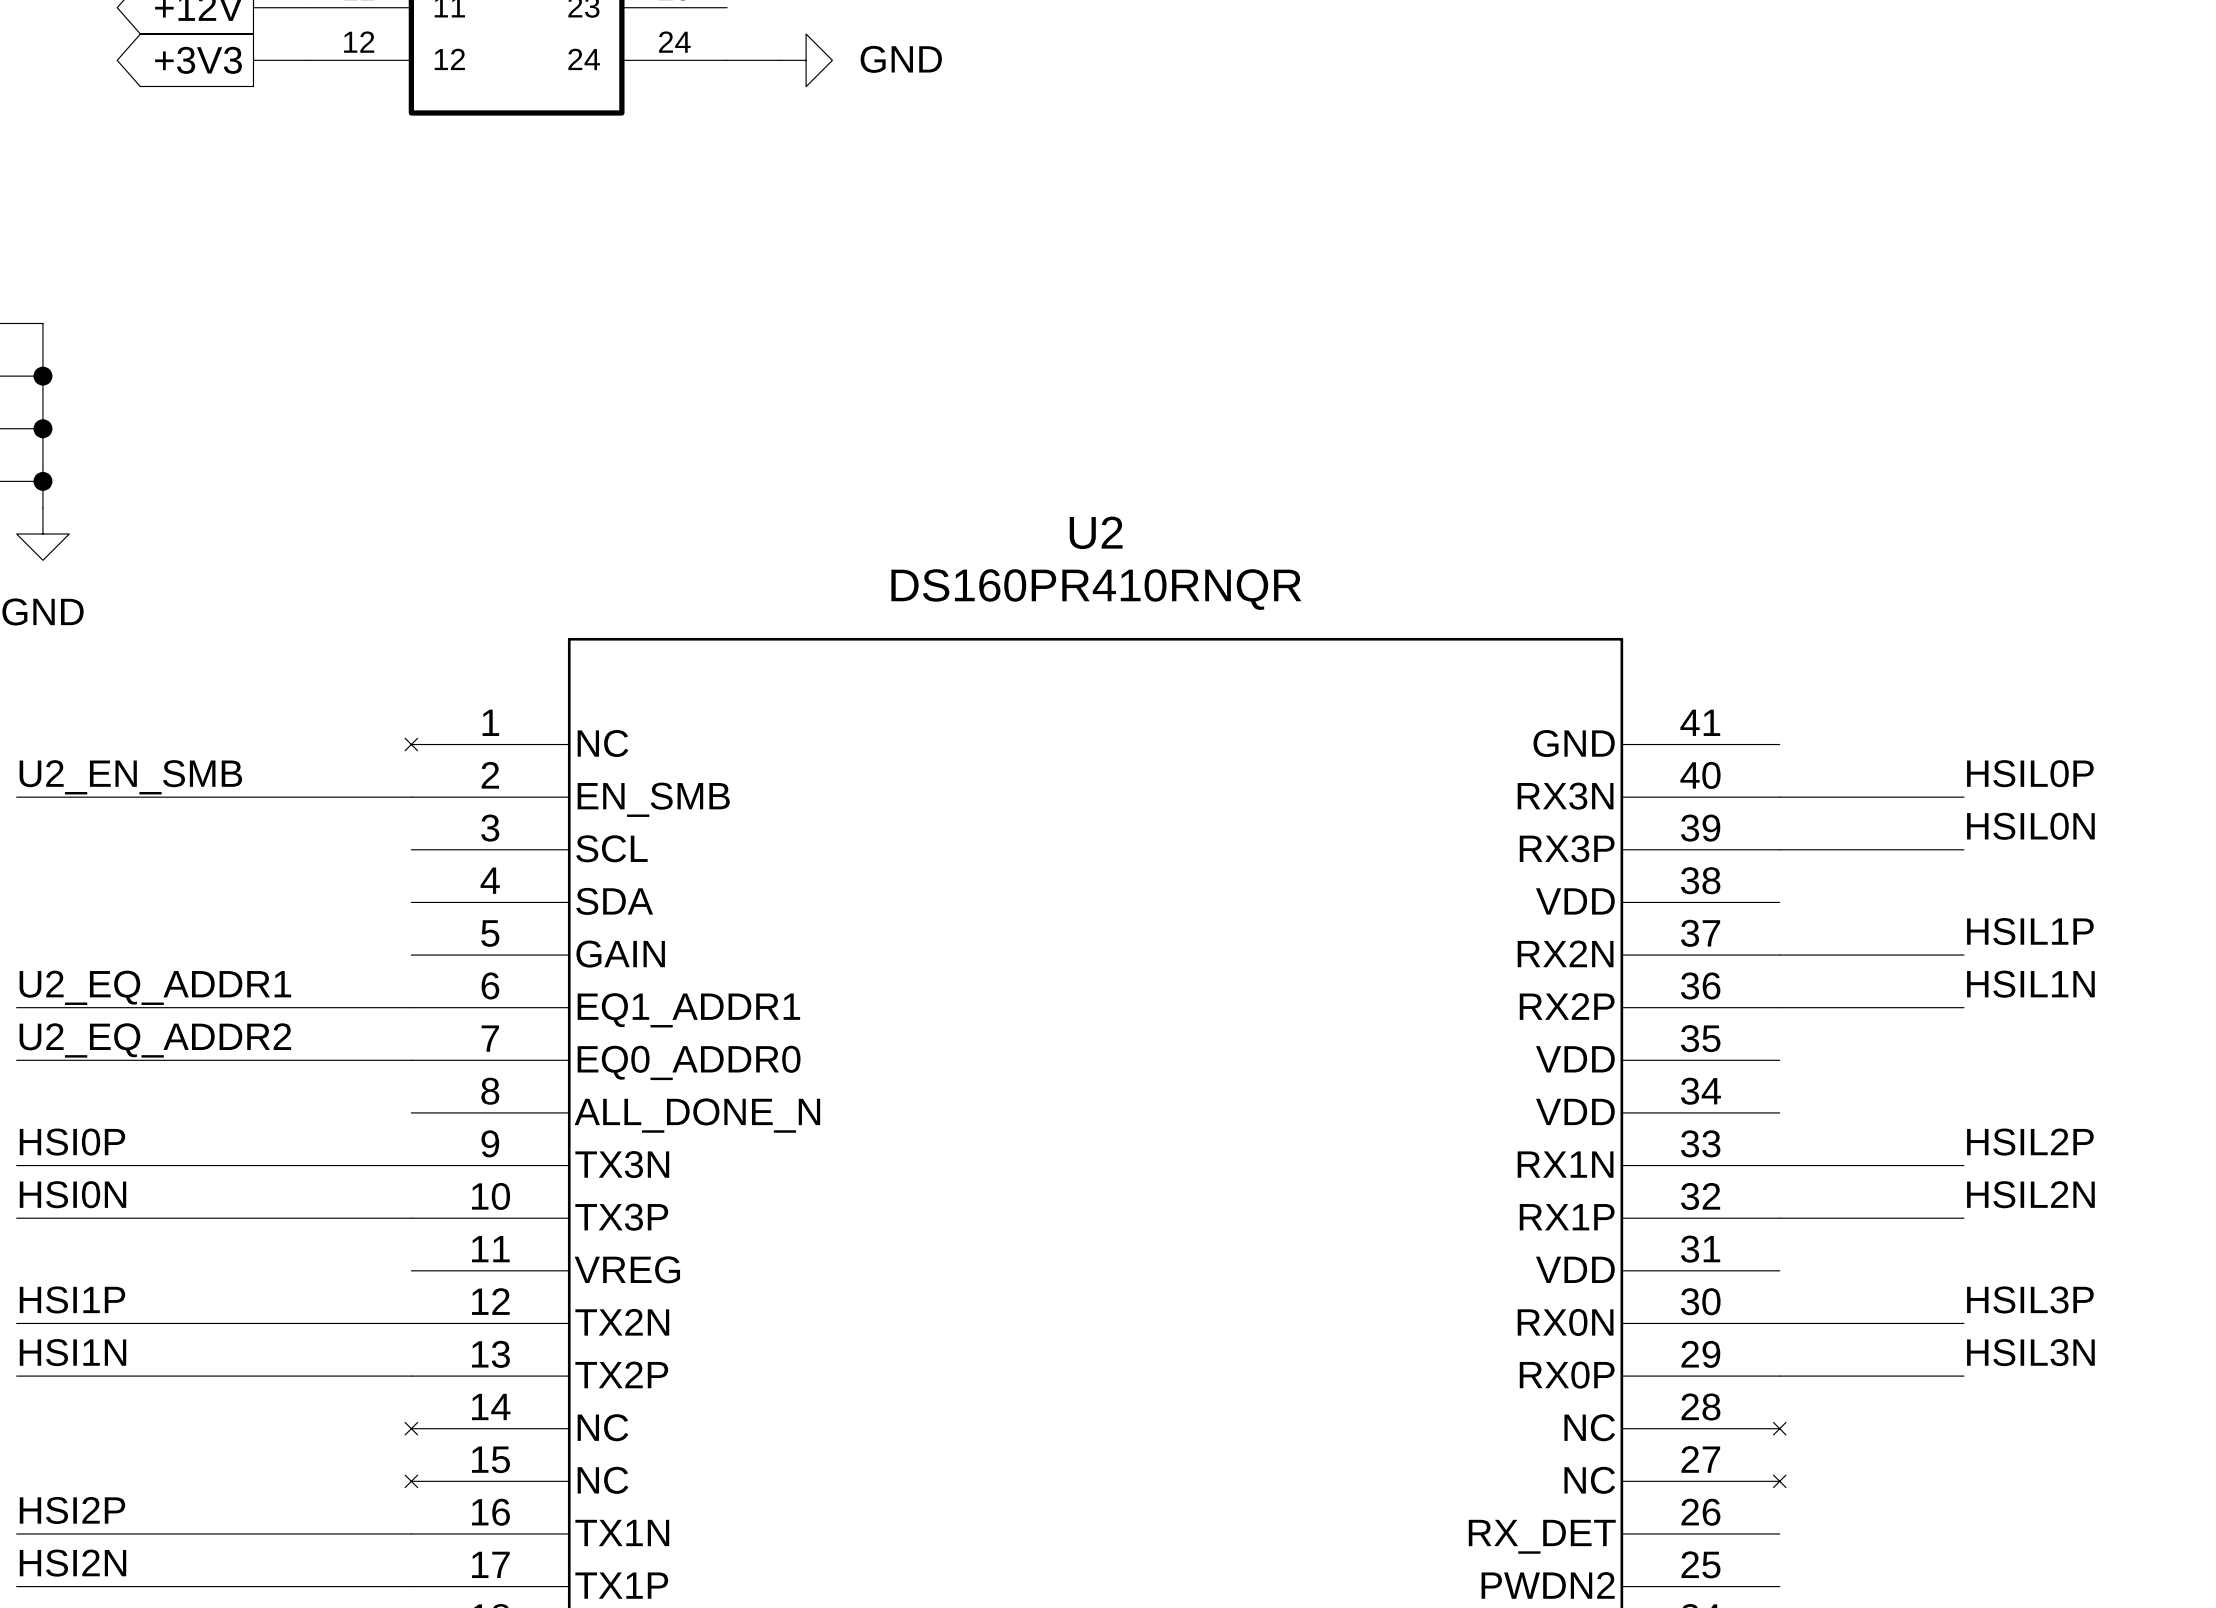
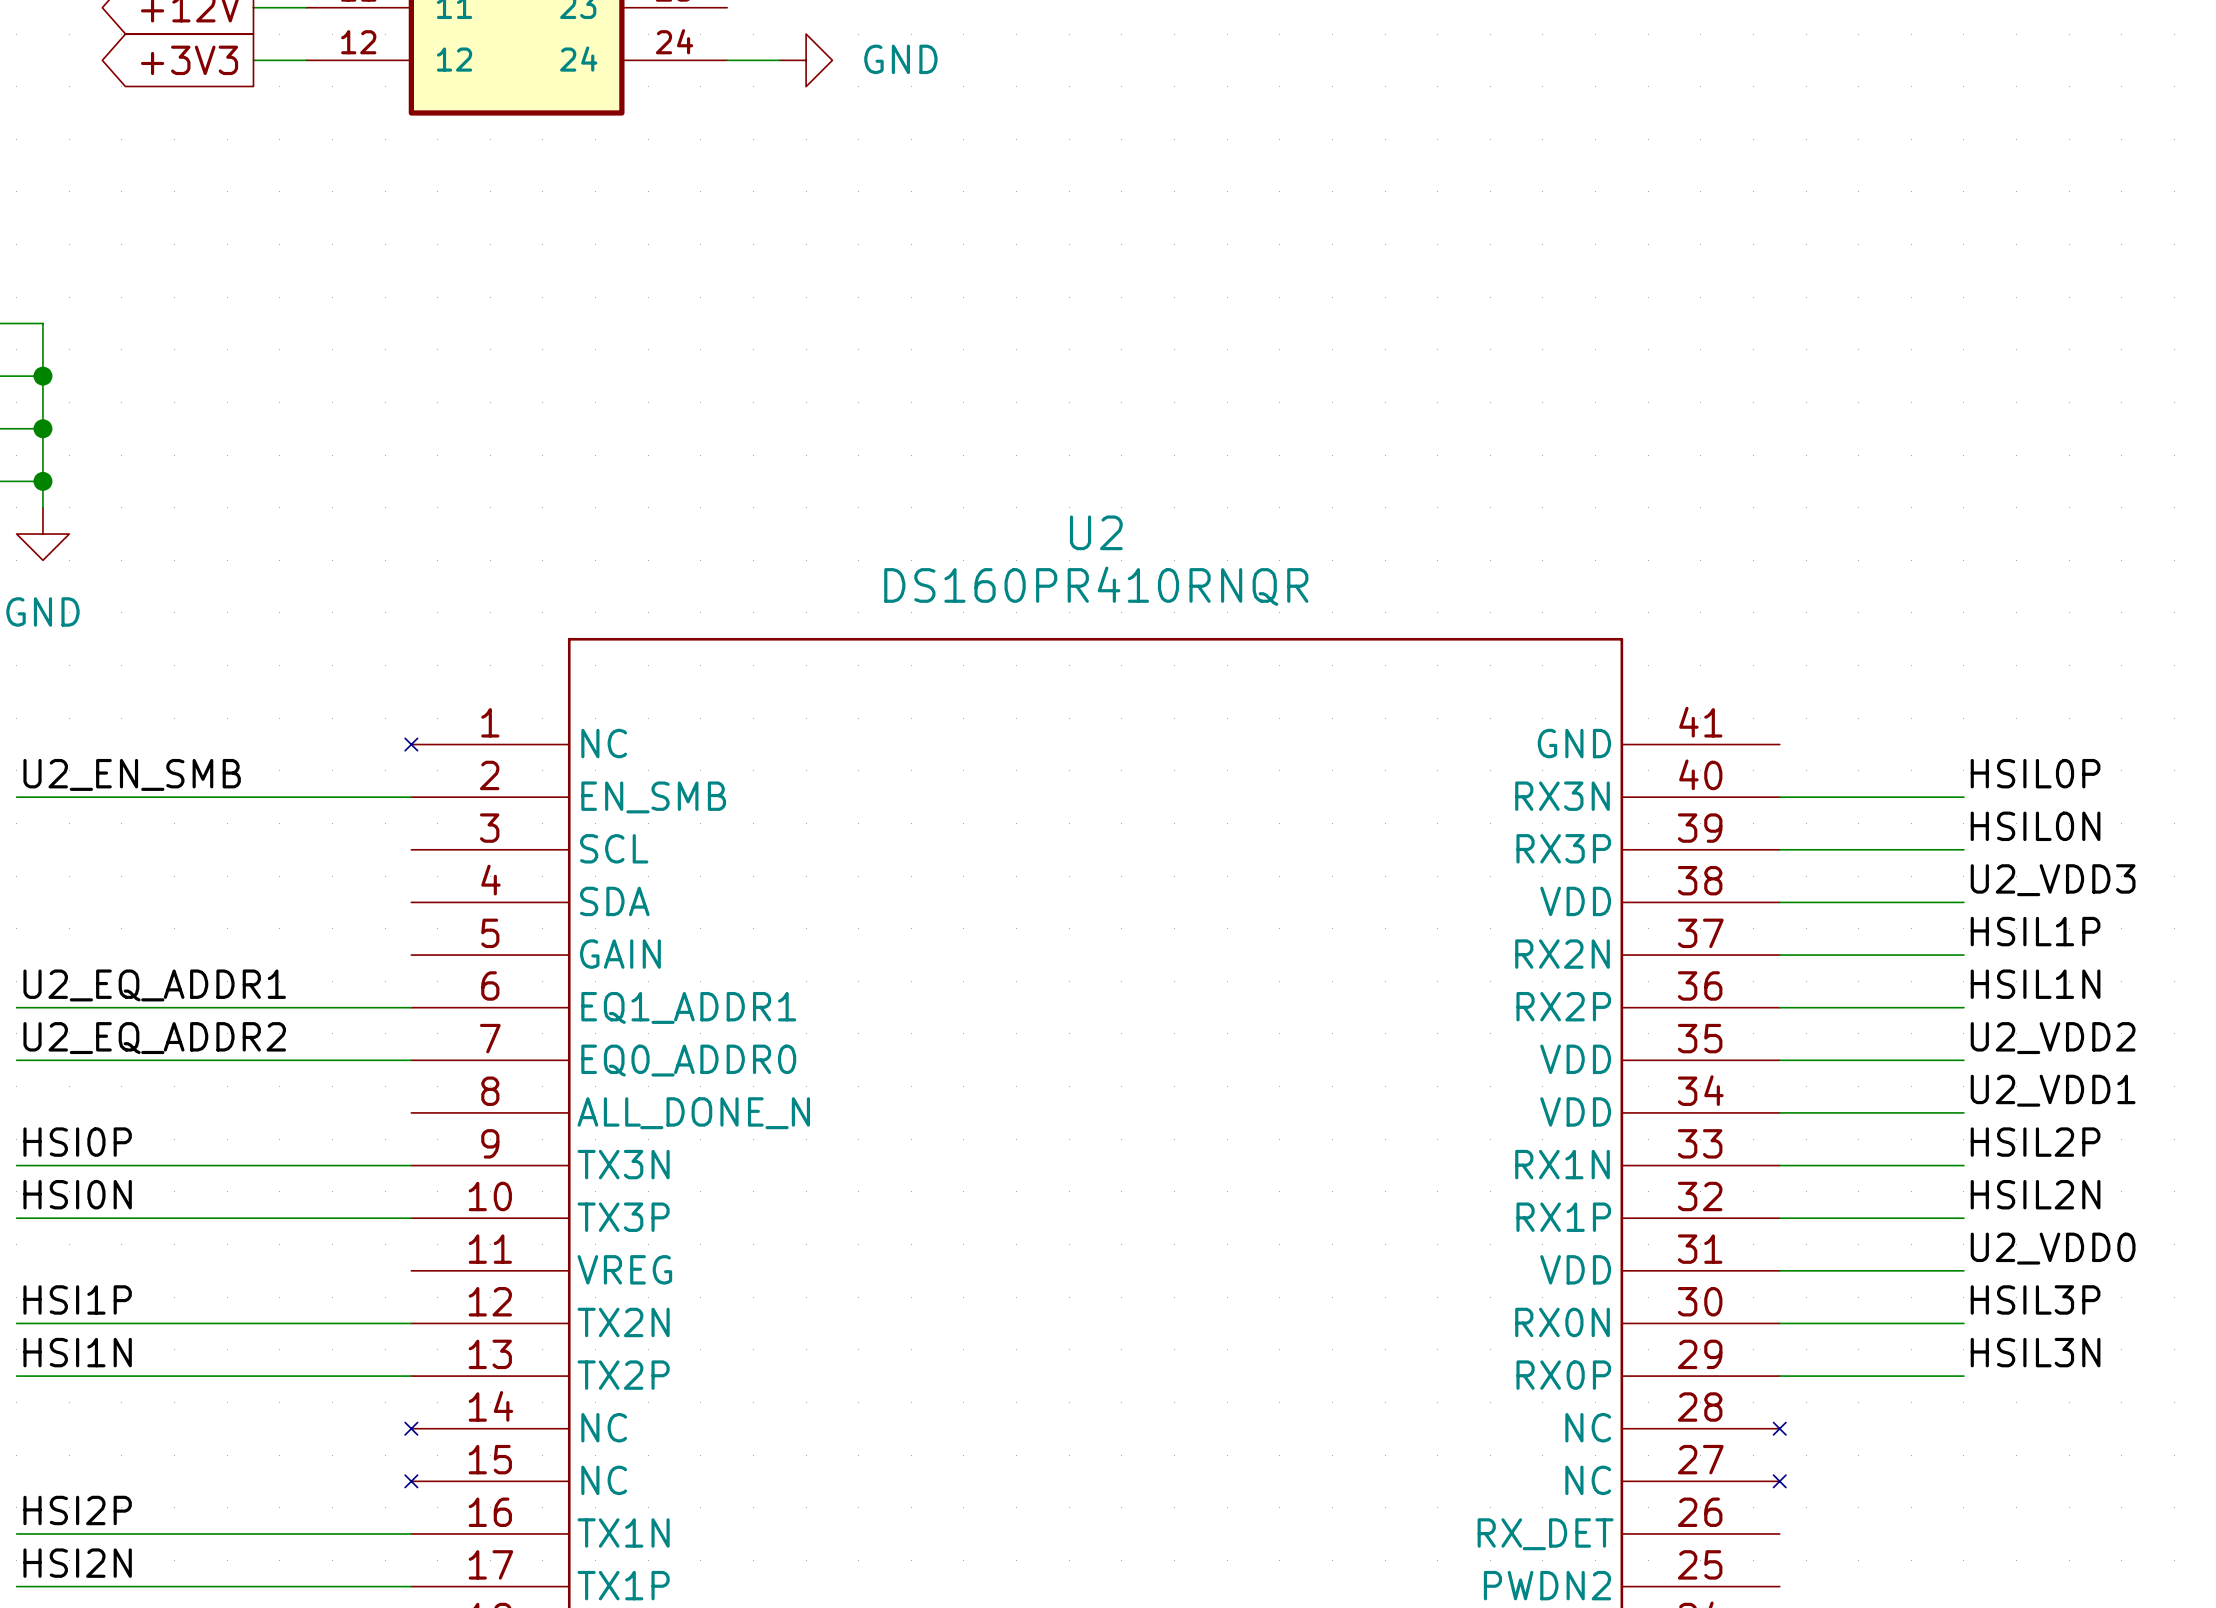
label: none -> U2_VDD3 (2053, 880)
wire: none -> (1779, 902) (1963, 902)
label: none -> U2_VDD2 (2053, 1038)
wire: none -> (1779, 1060) (1963, 1060)
label: none -> U2_VDD1 (2053, 1090)
wire: none -> (1779, 1112) (1963, 1112)
label: none -> U2_VDD0 (2053, 1248)
wire: none -> (1779, 1270) (1963, 1270)

